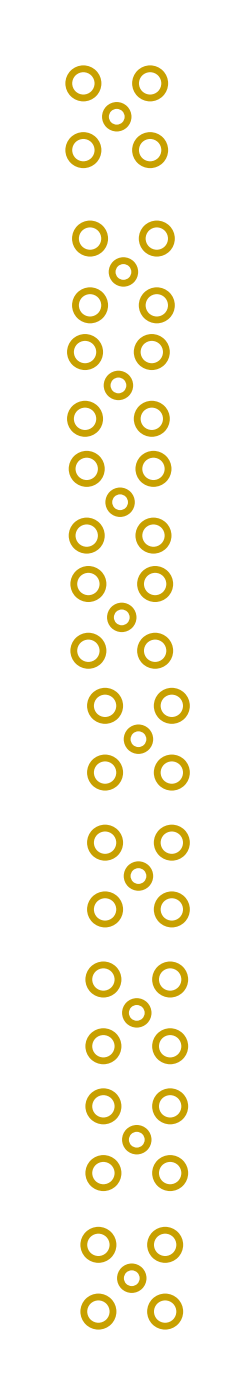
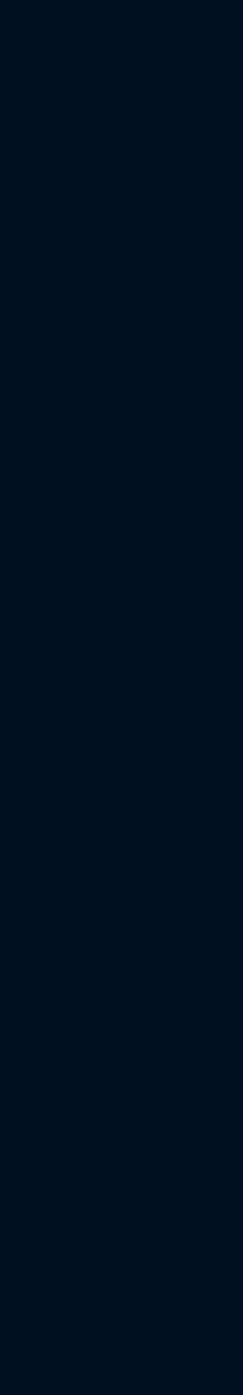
part: (116, 116) -> none
part: (123, 271) -> none
part: (118, 385) -> none
part: (120, 502) -> none
part: (121, 617) -> none
part: (138, 739) -> none
part: (138, 876) -> none
part: (136, 1012) -> none
part: (136, 1139) -> none
part: (131, 1278) -> none

